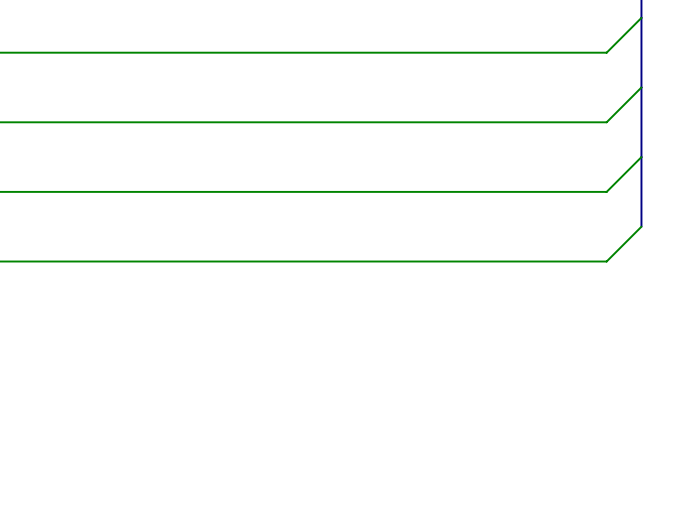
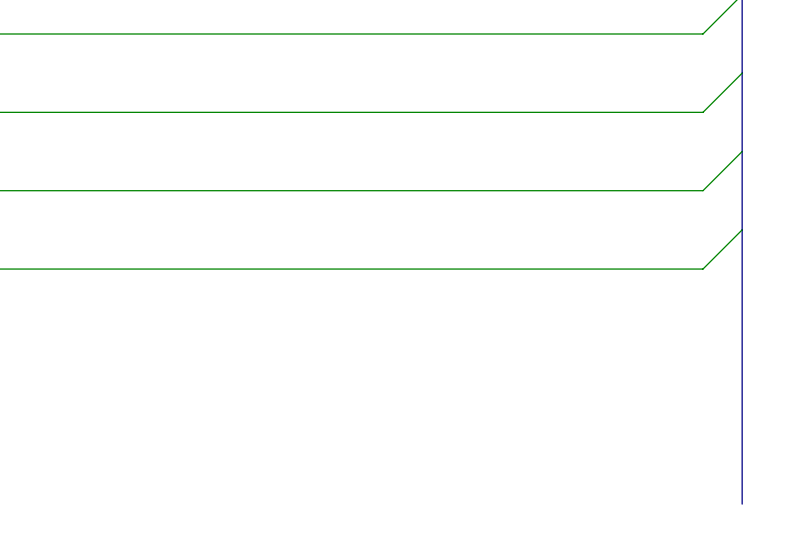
bus: none -> (742, 229) (742, 504)

